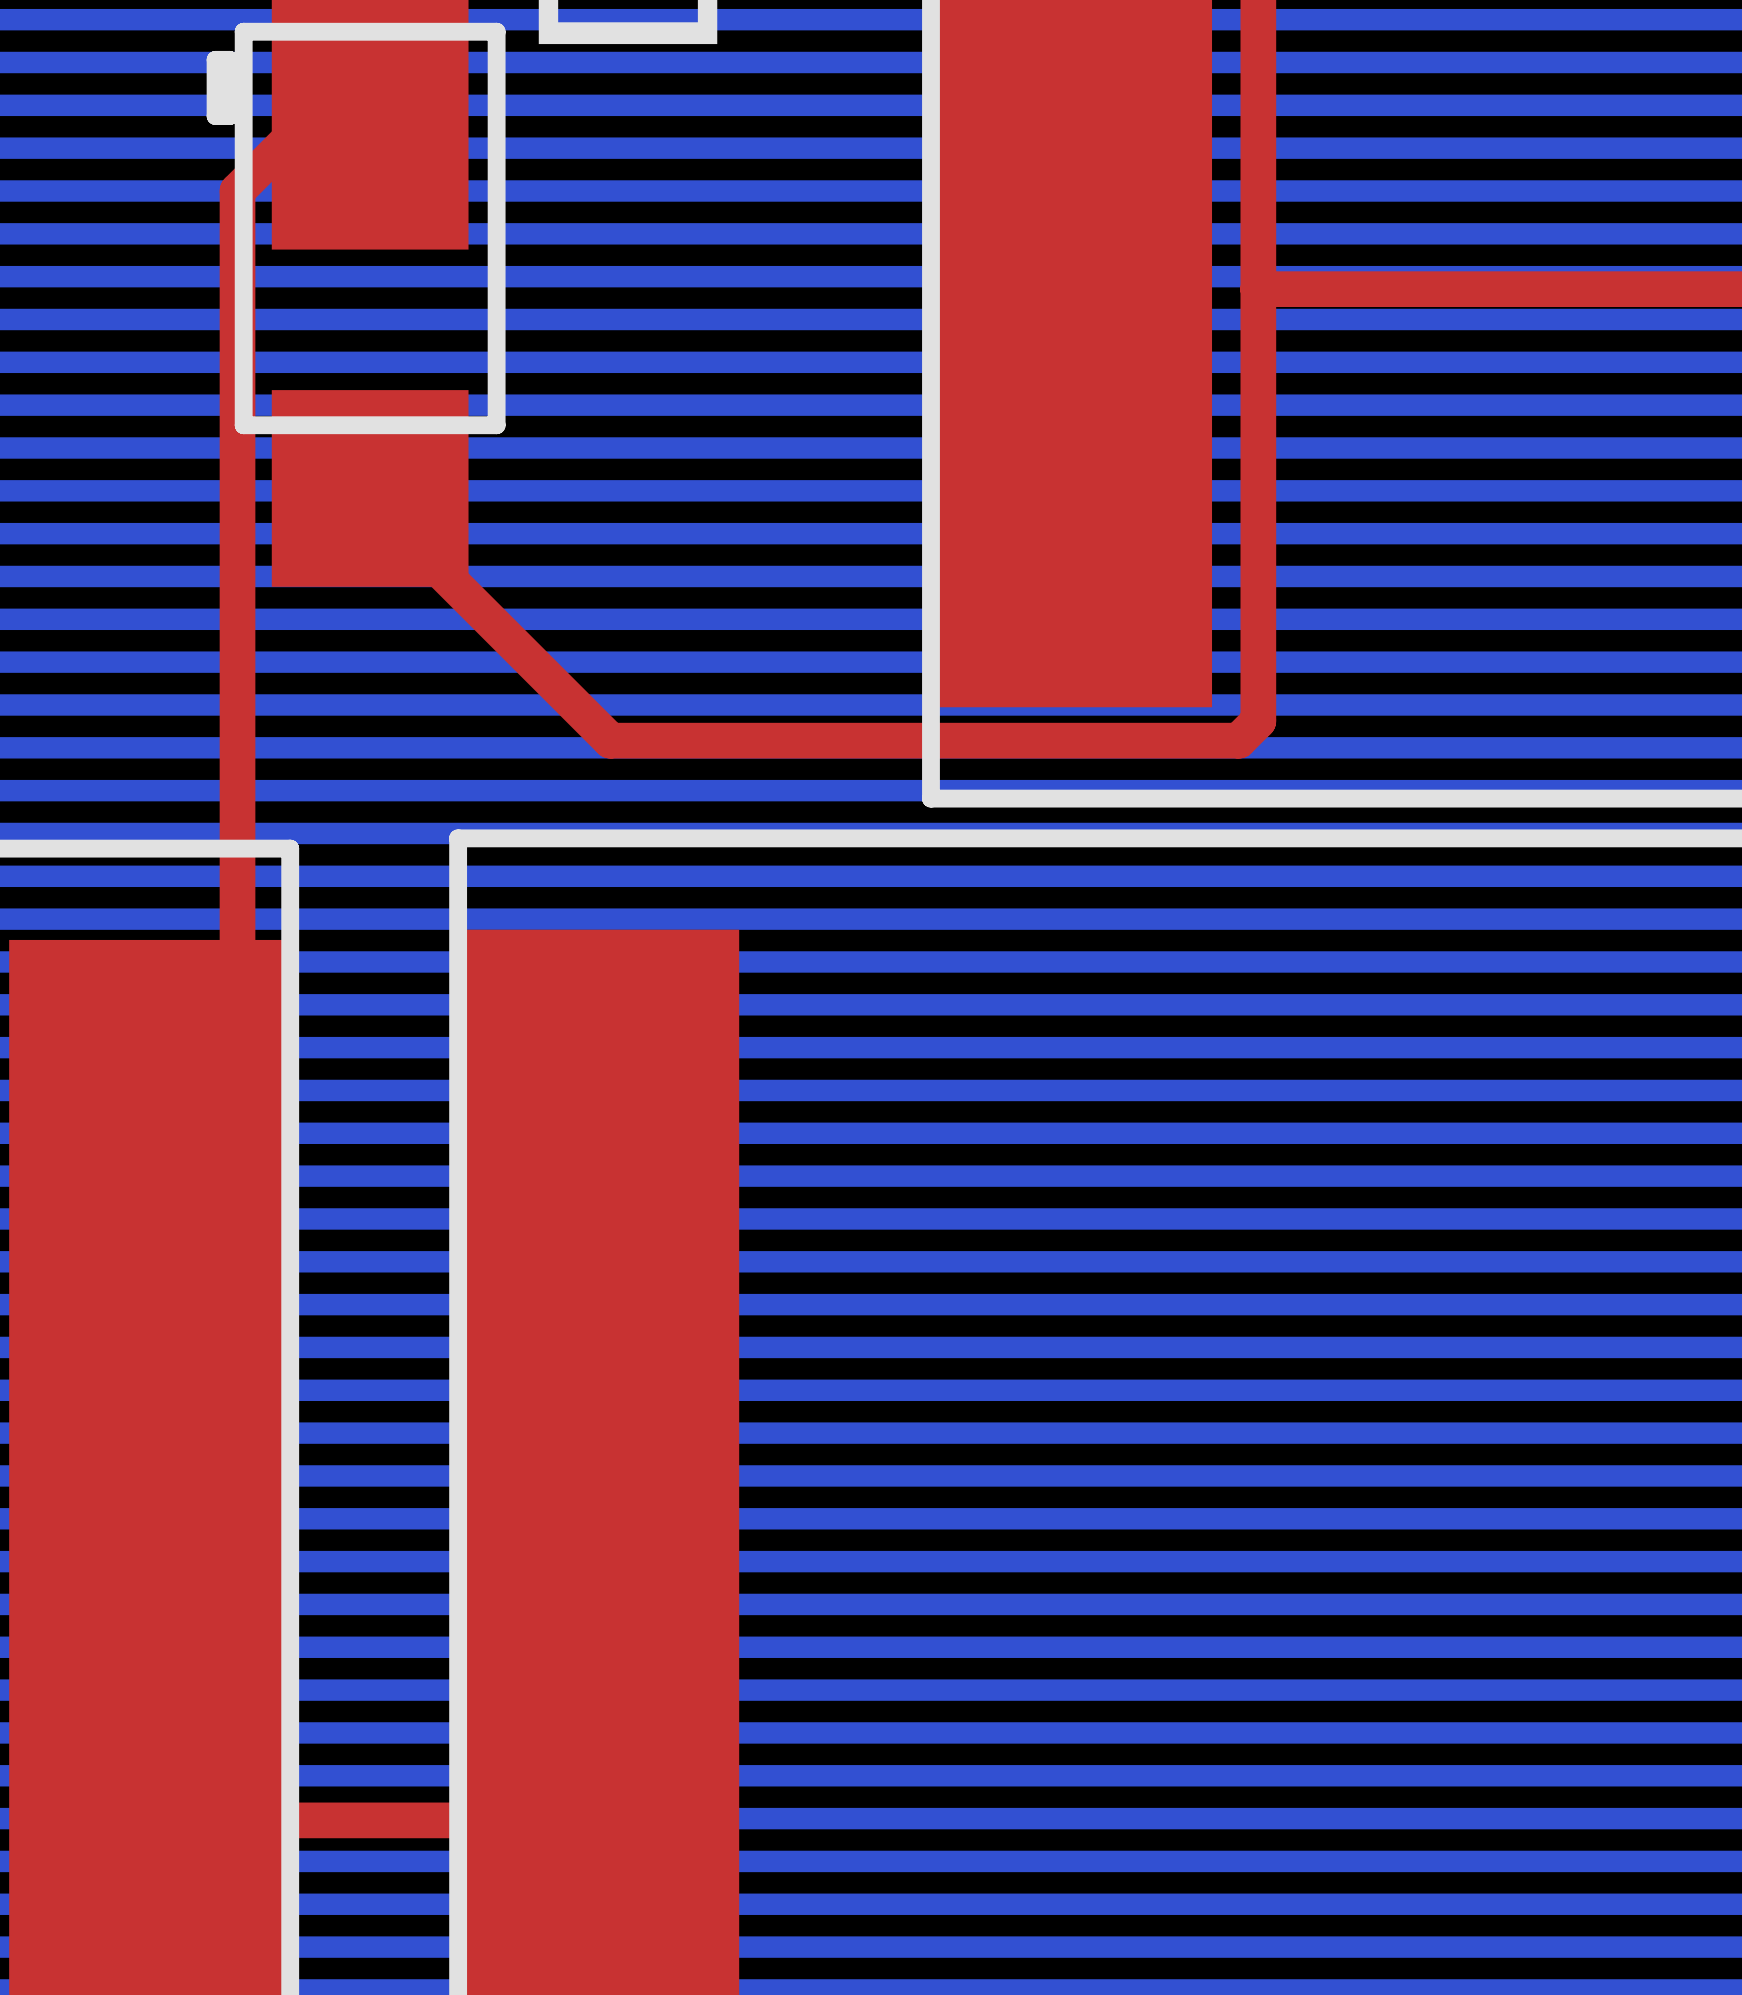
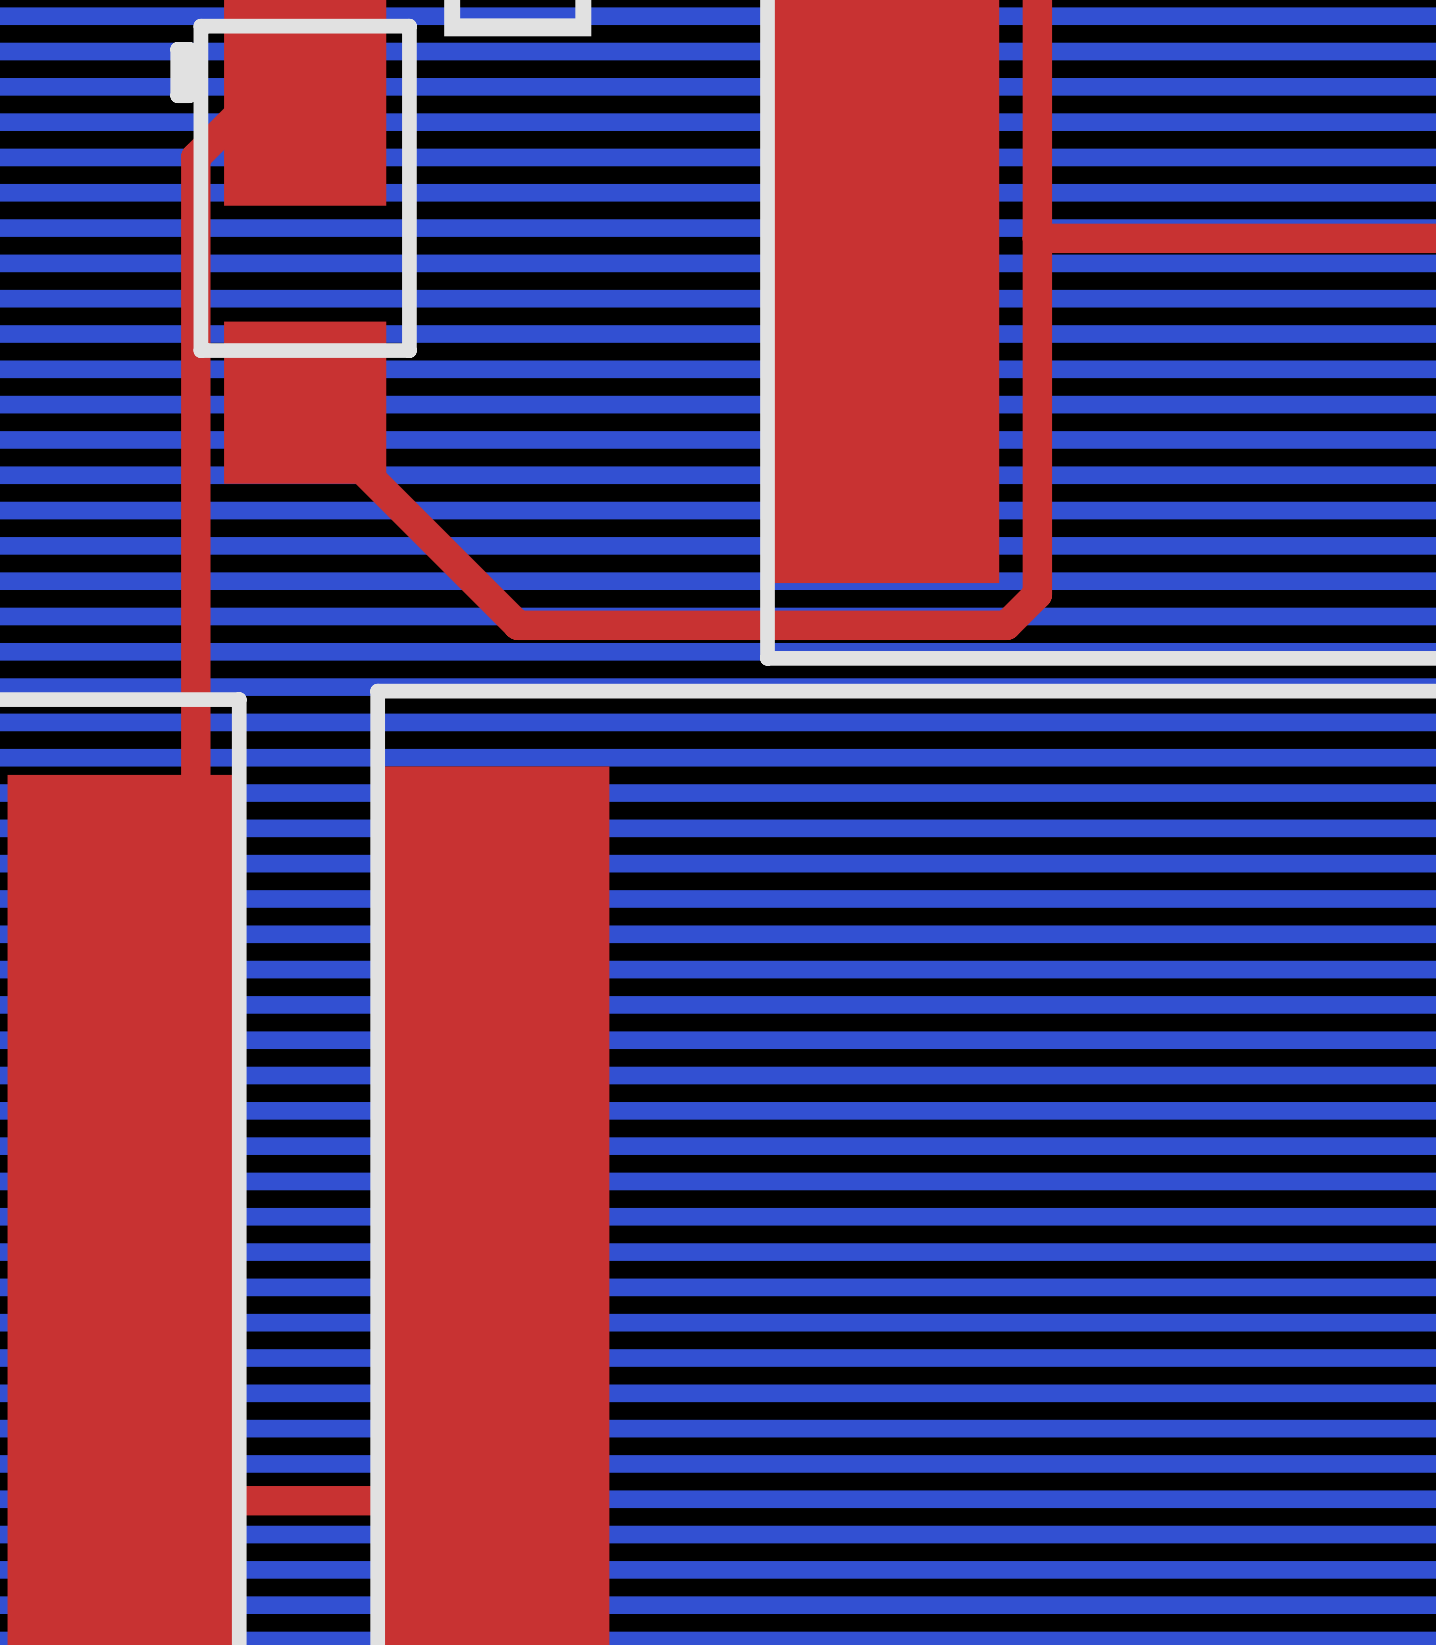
top track: (610, 740) (1238, 740) -> (503, 610) (518, 625) (1006, 625) (1021, 610)

